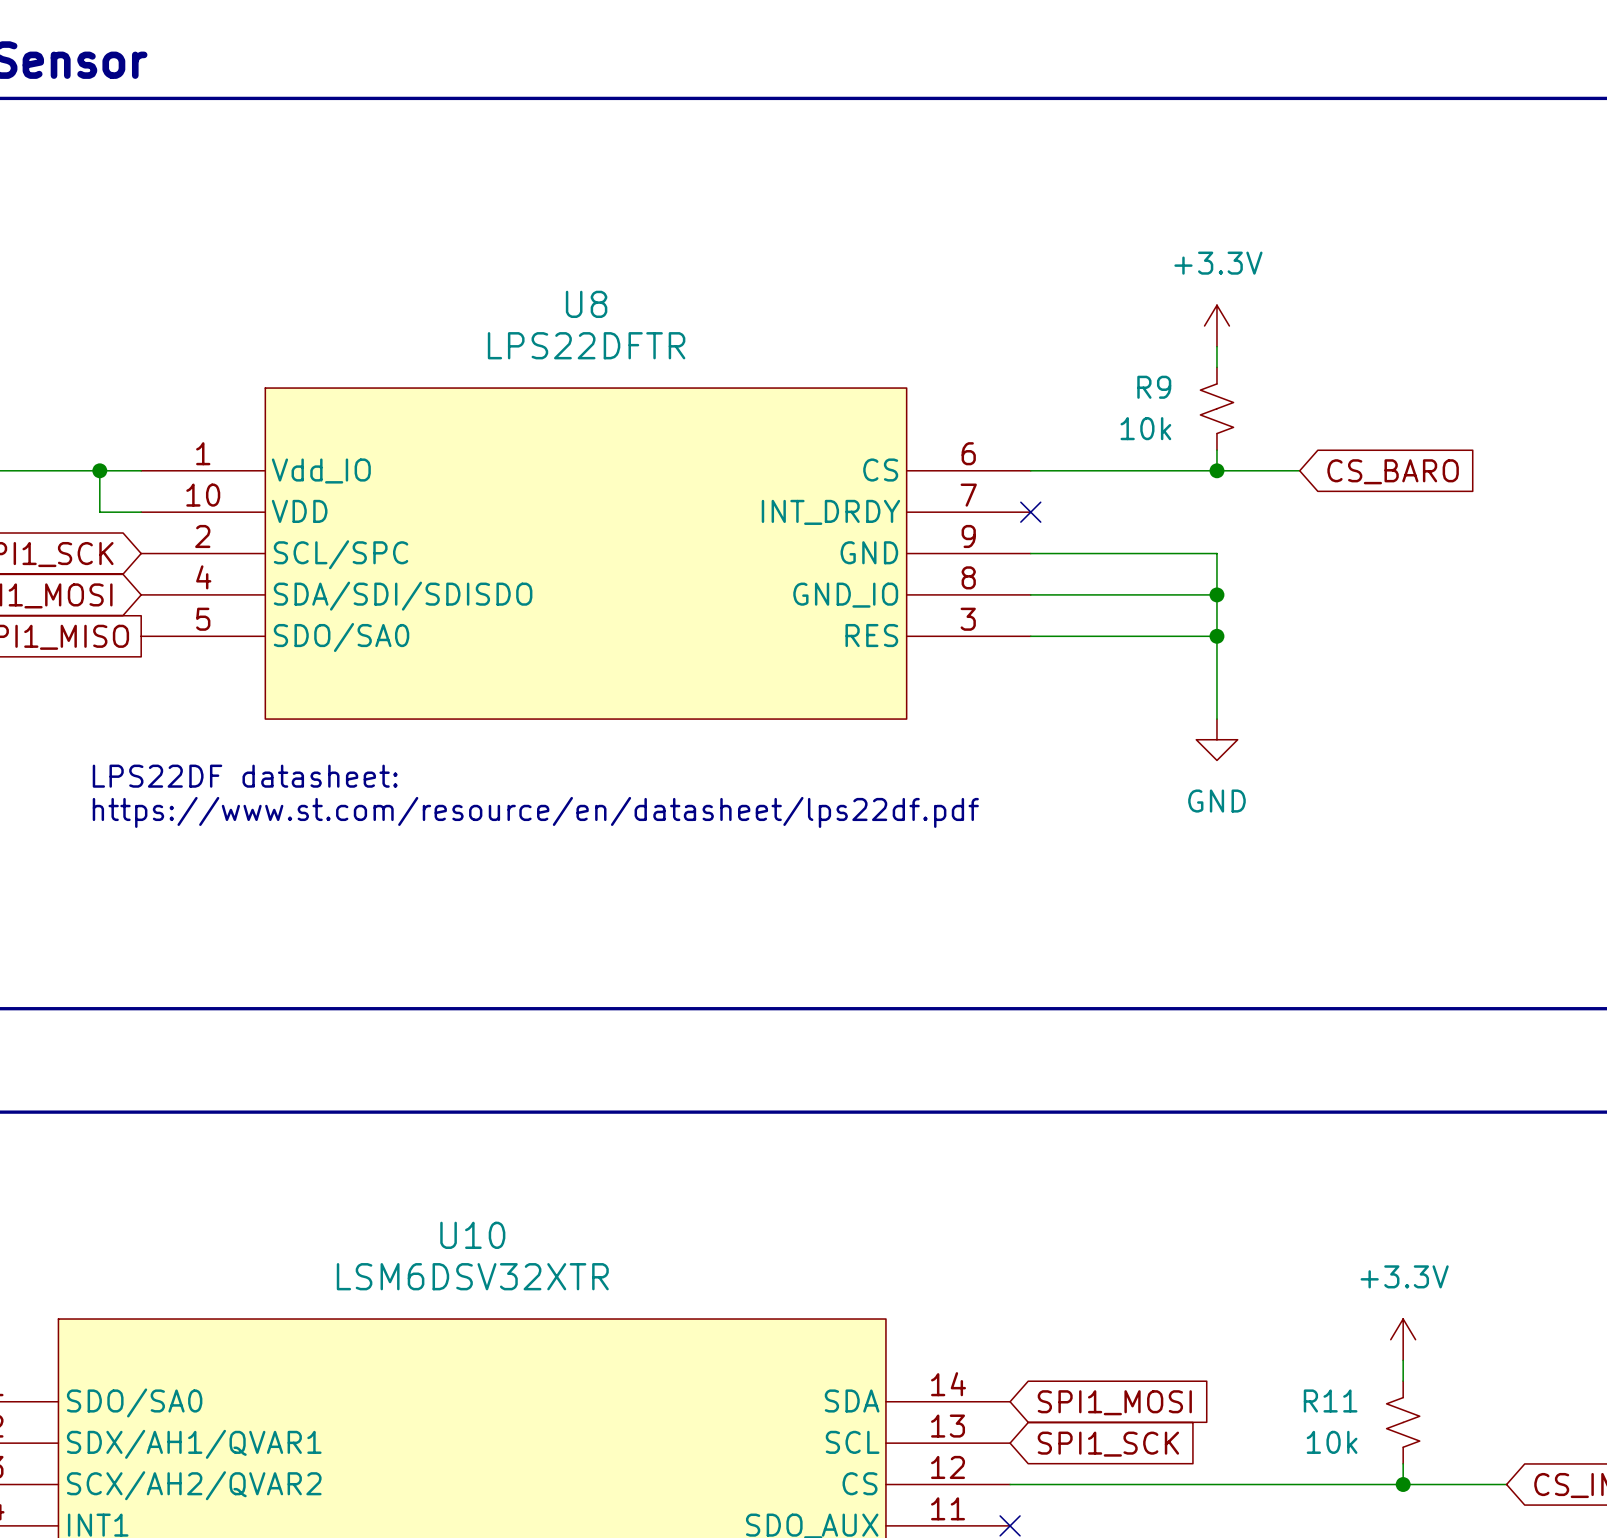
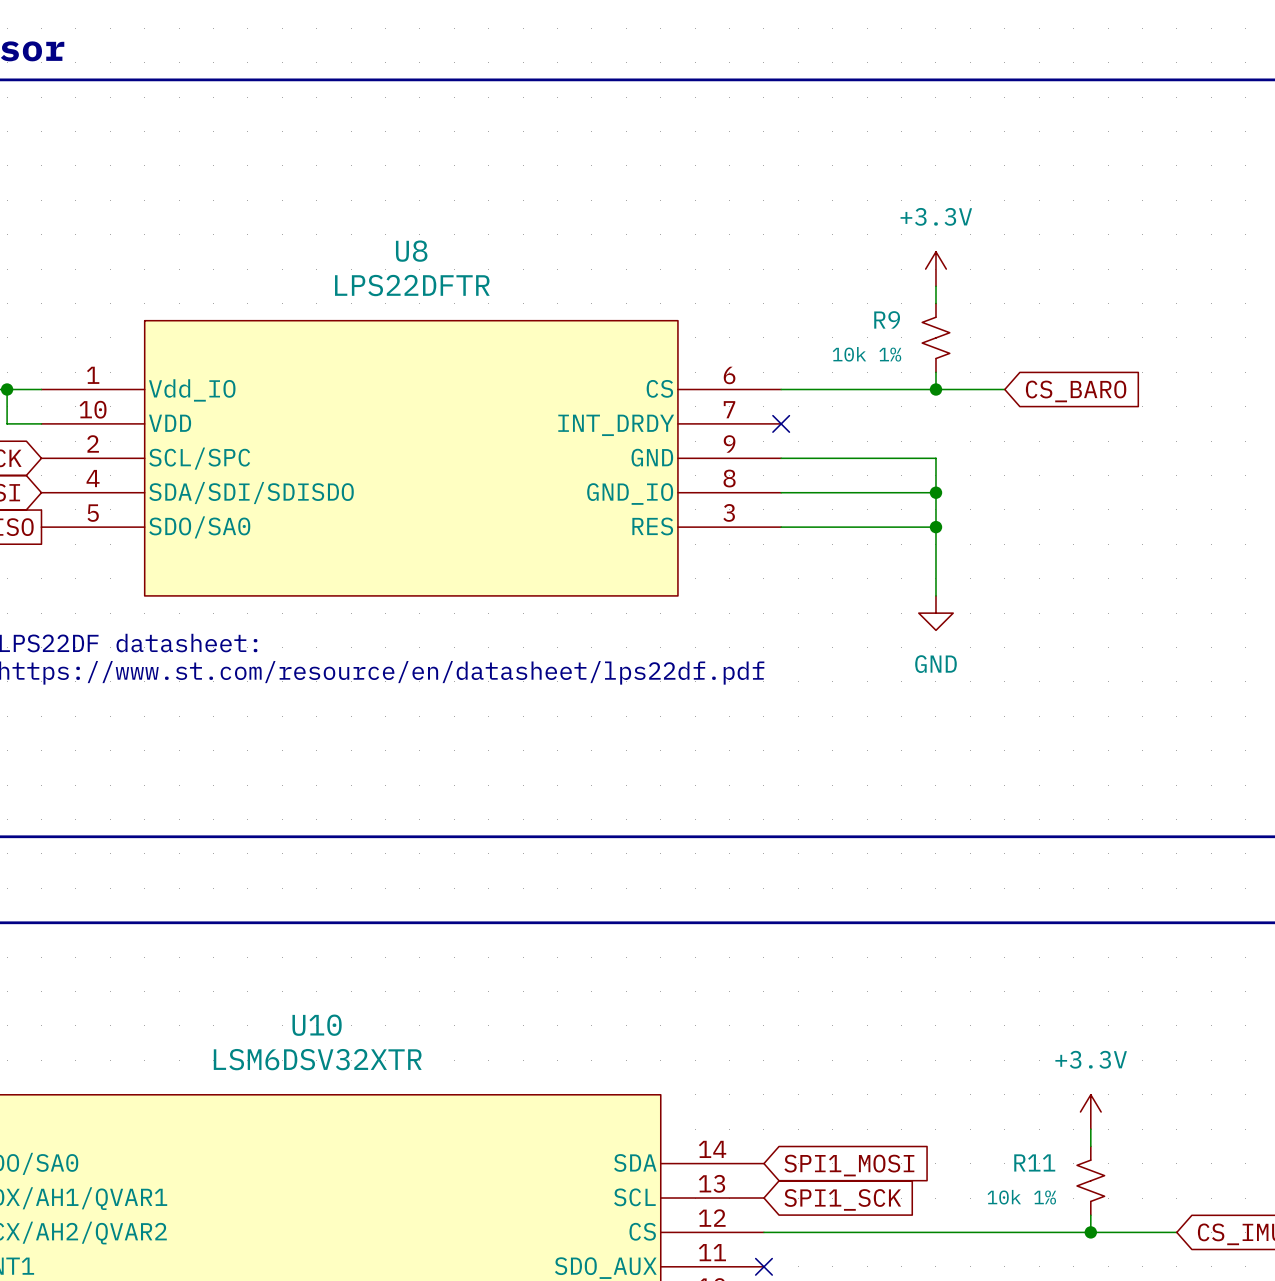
R9 value: 10k (1145, 428) -> 10k 1% (866, 354)
R11 value: 10k (1332, 1442) -> 10k 1% (1021, 1197)

